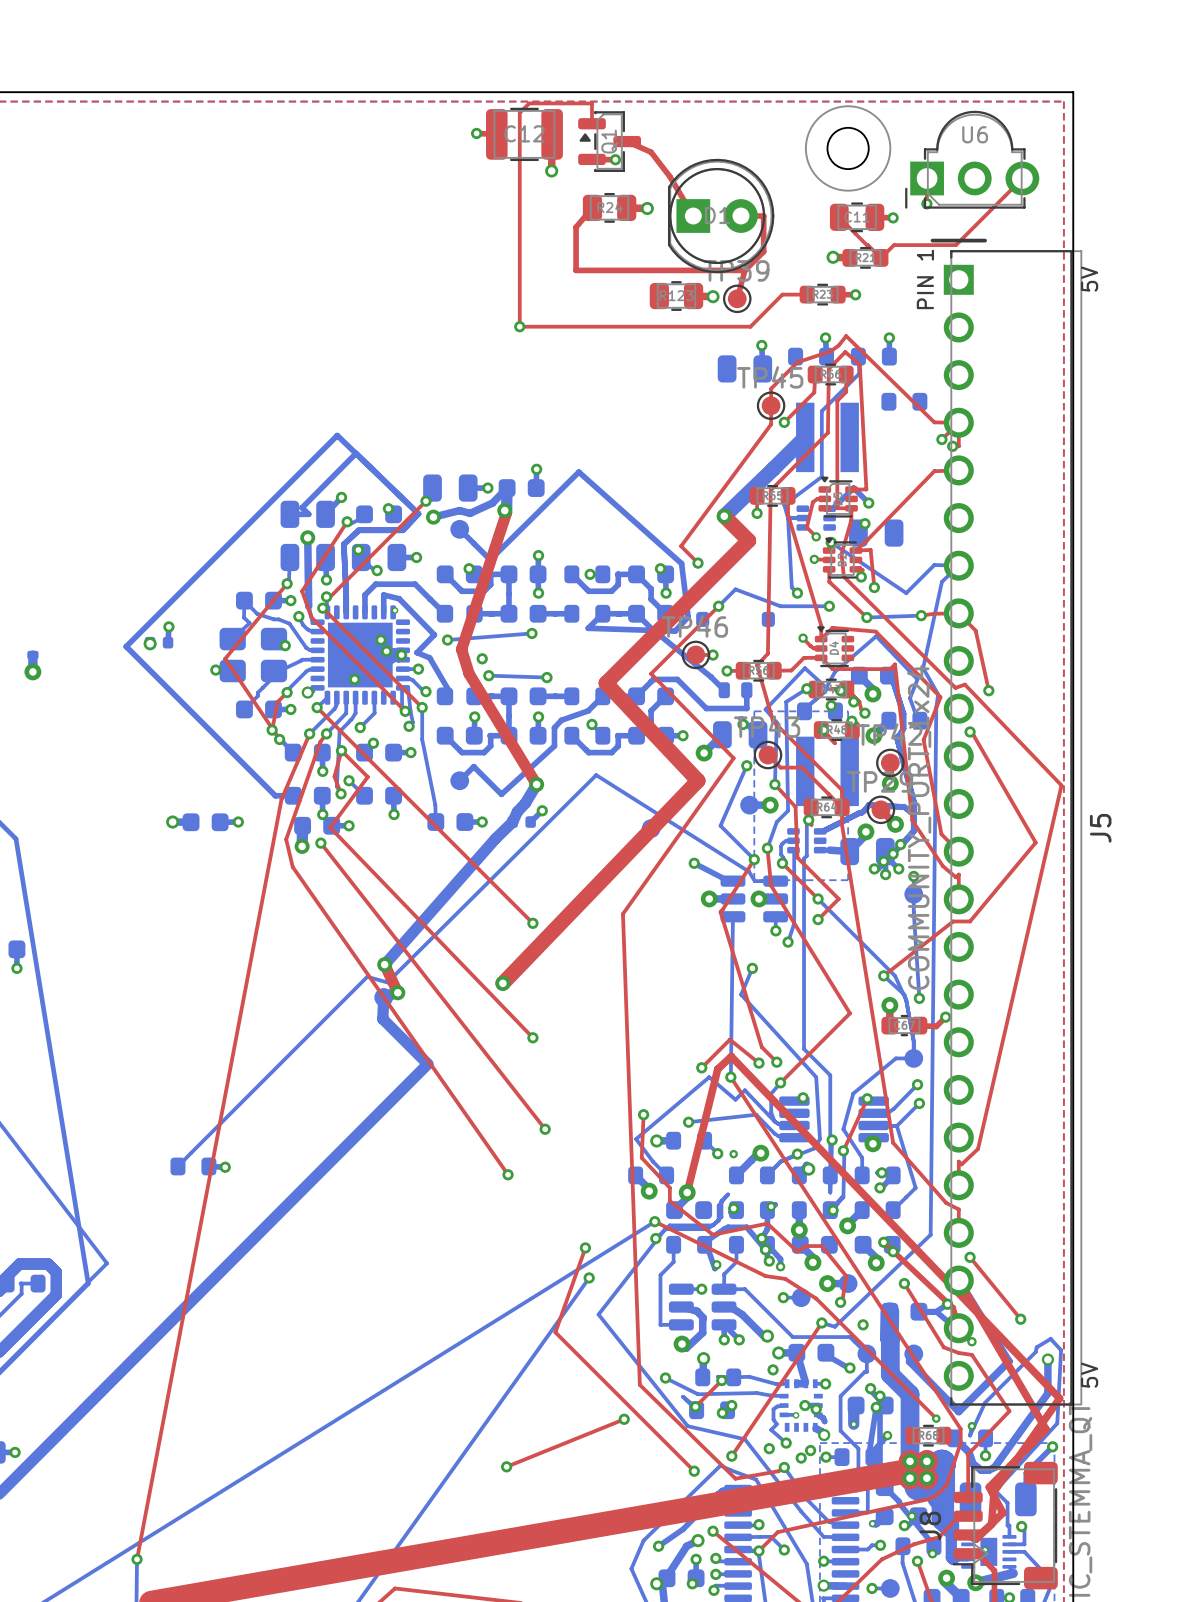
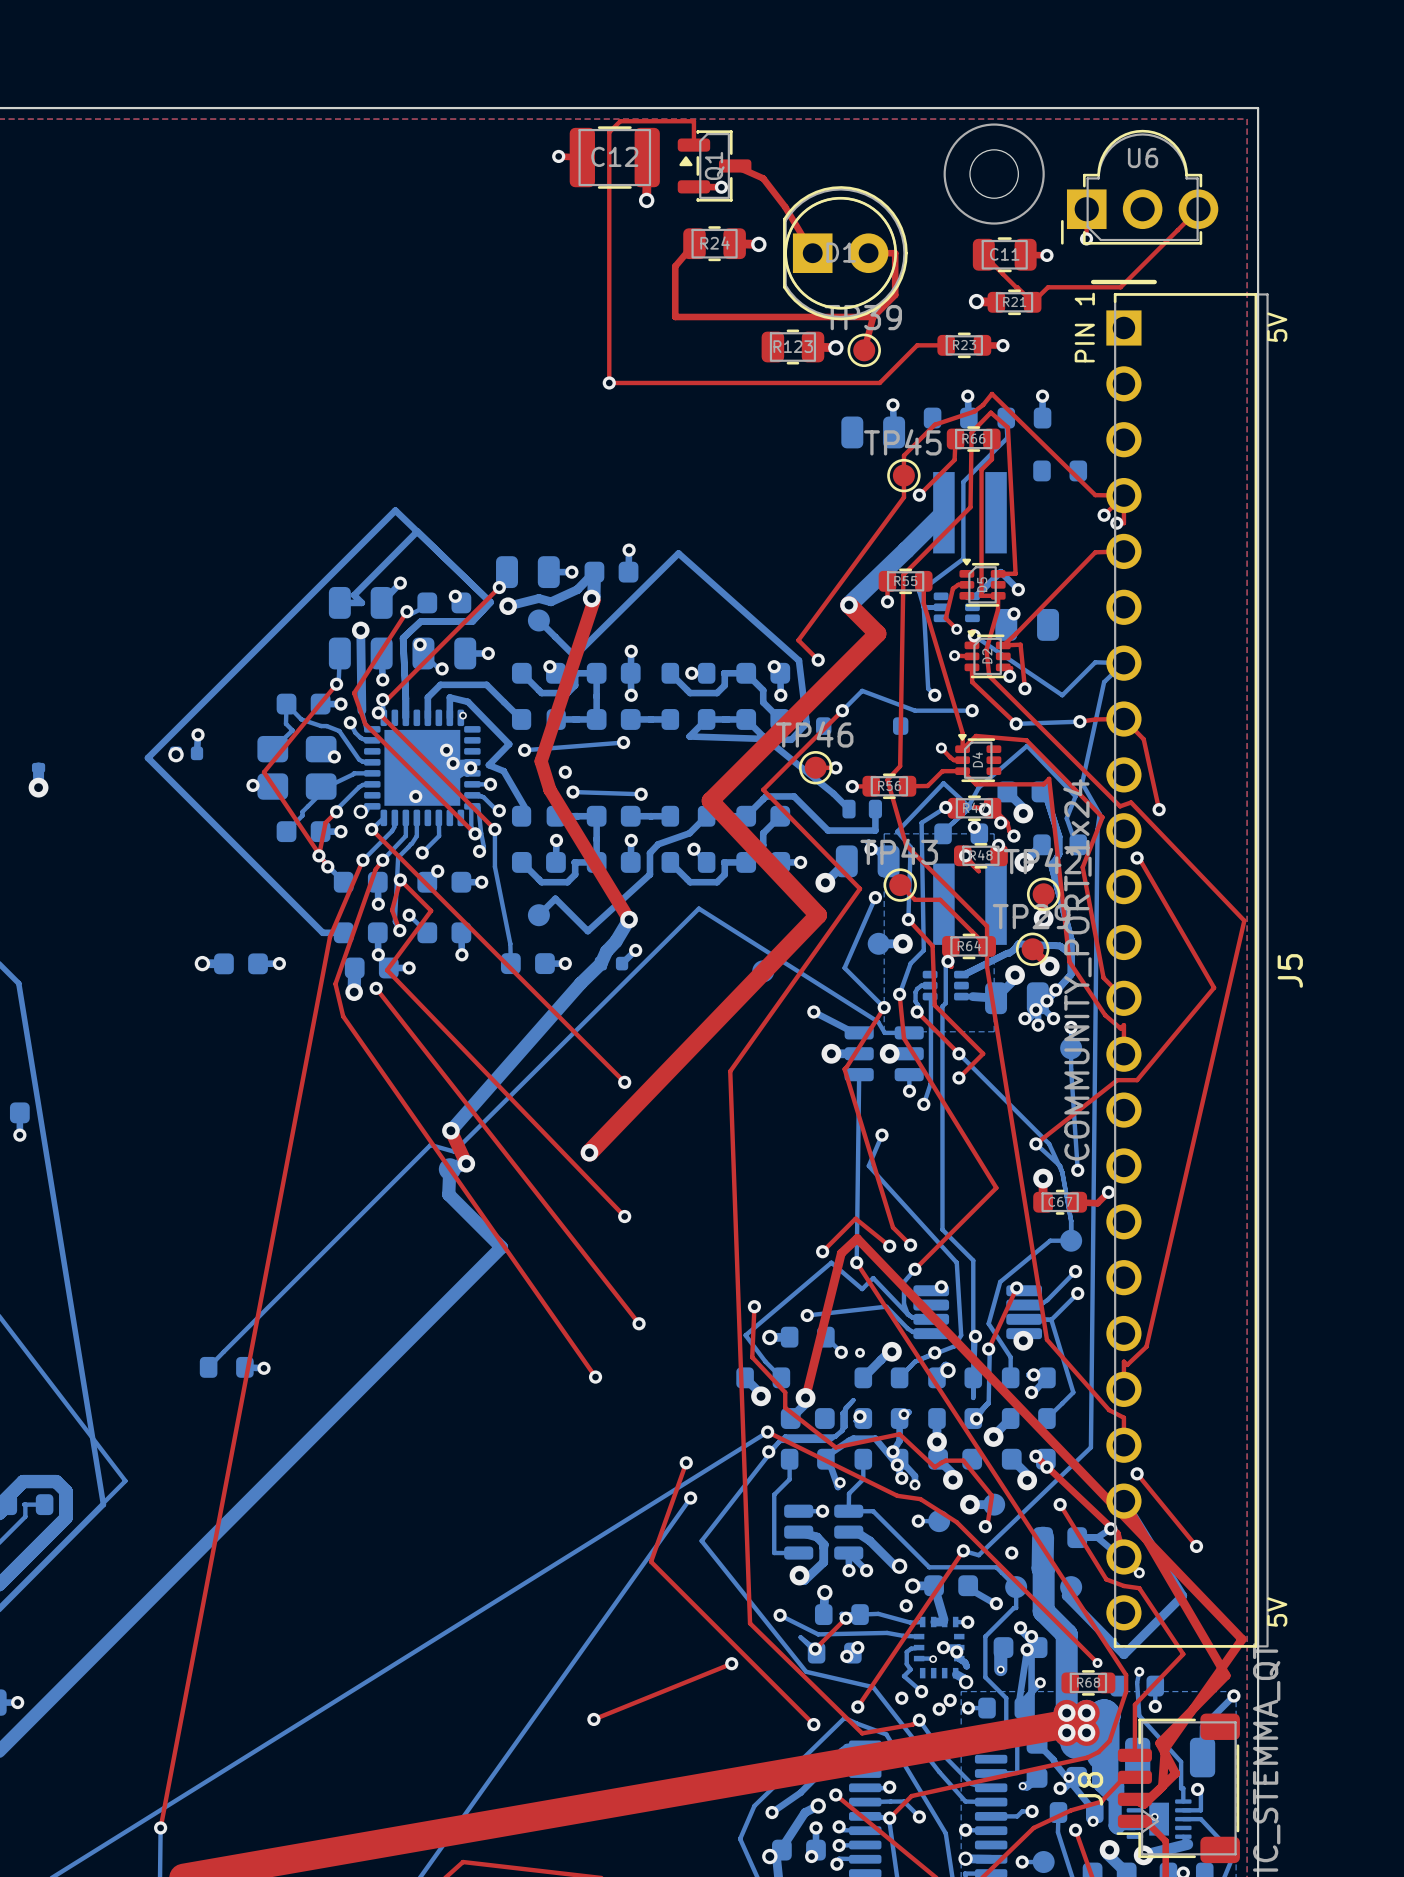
bottom track: (1047, 1359) (1047, 1393) (994, 1467) (988, 1470) (981, 1470) (972, 1463) (969, 1452) (954, 1438) -> none
via: (1047, 1359) -> none
bottom track: (970, 1435) (985, 1402) (1035, 1352) (1036, 1347) (1050, 1338) (1061, 1350) (1057, 1423) (995, 1490) (1007, 1503) -> (1137, 1682) (1139, 1715) (1181, 1761)

